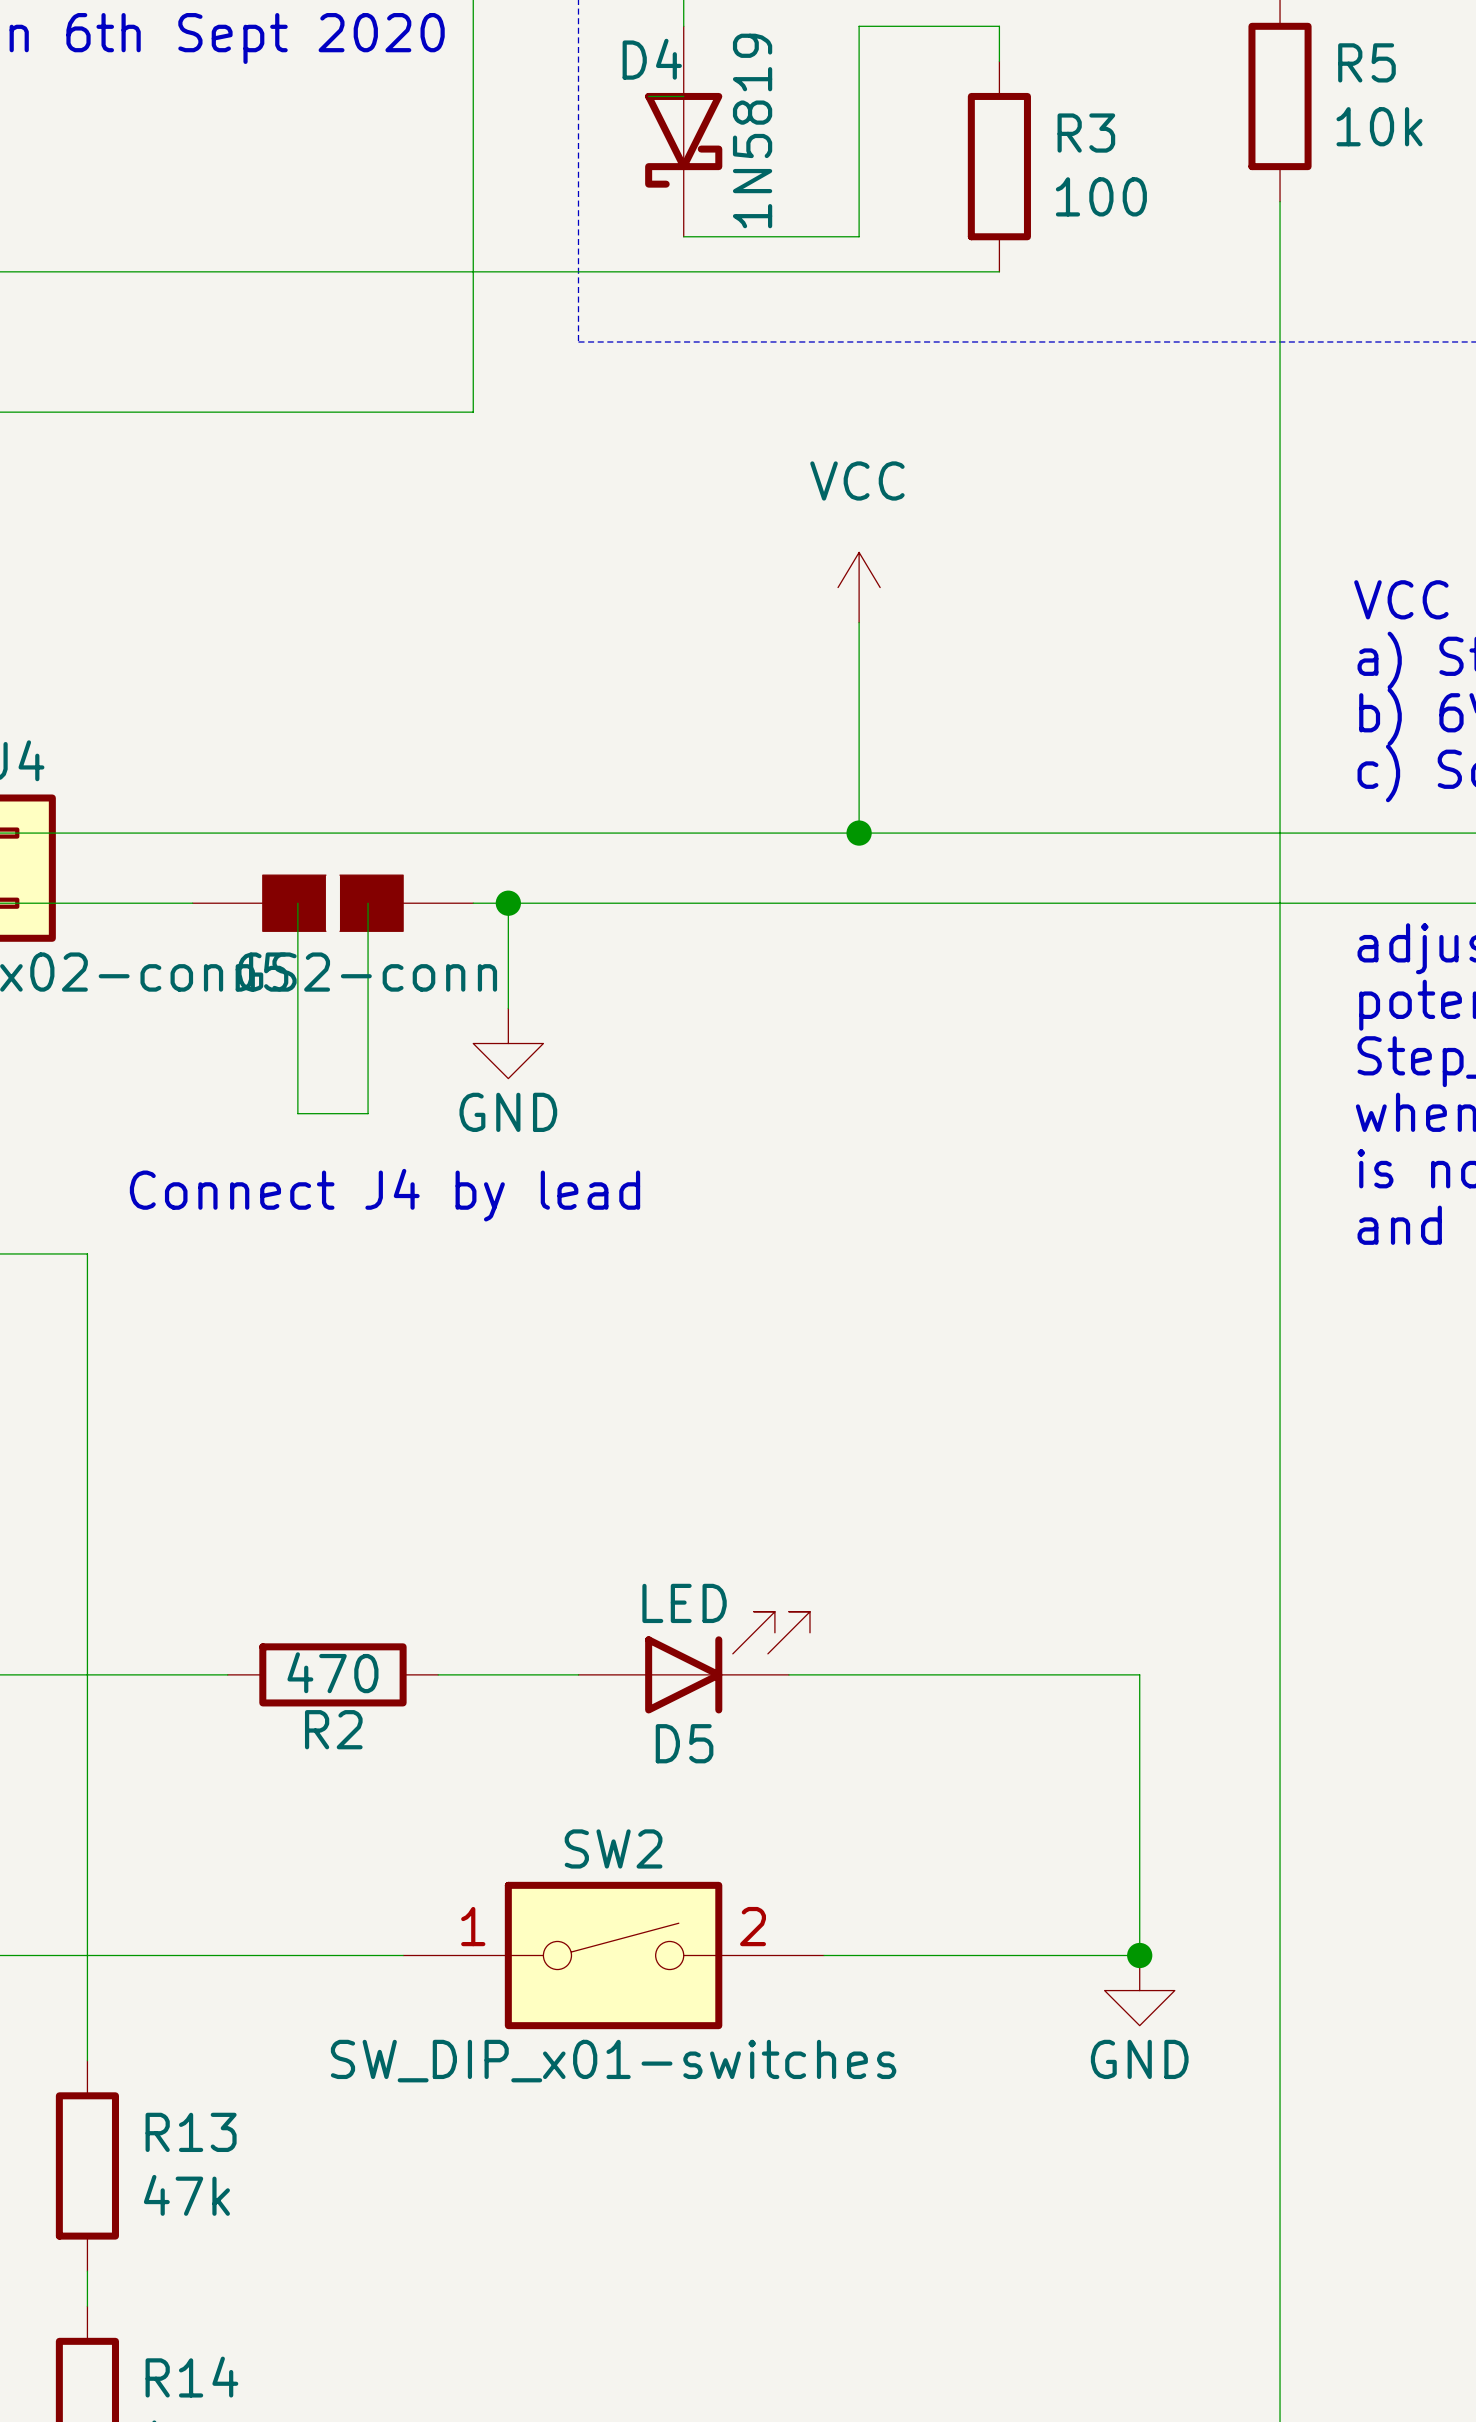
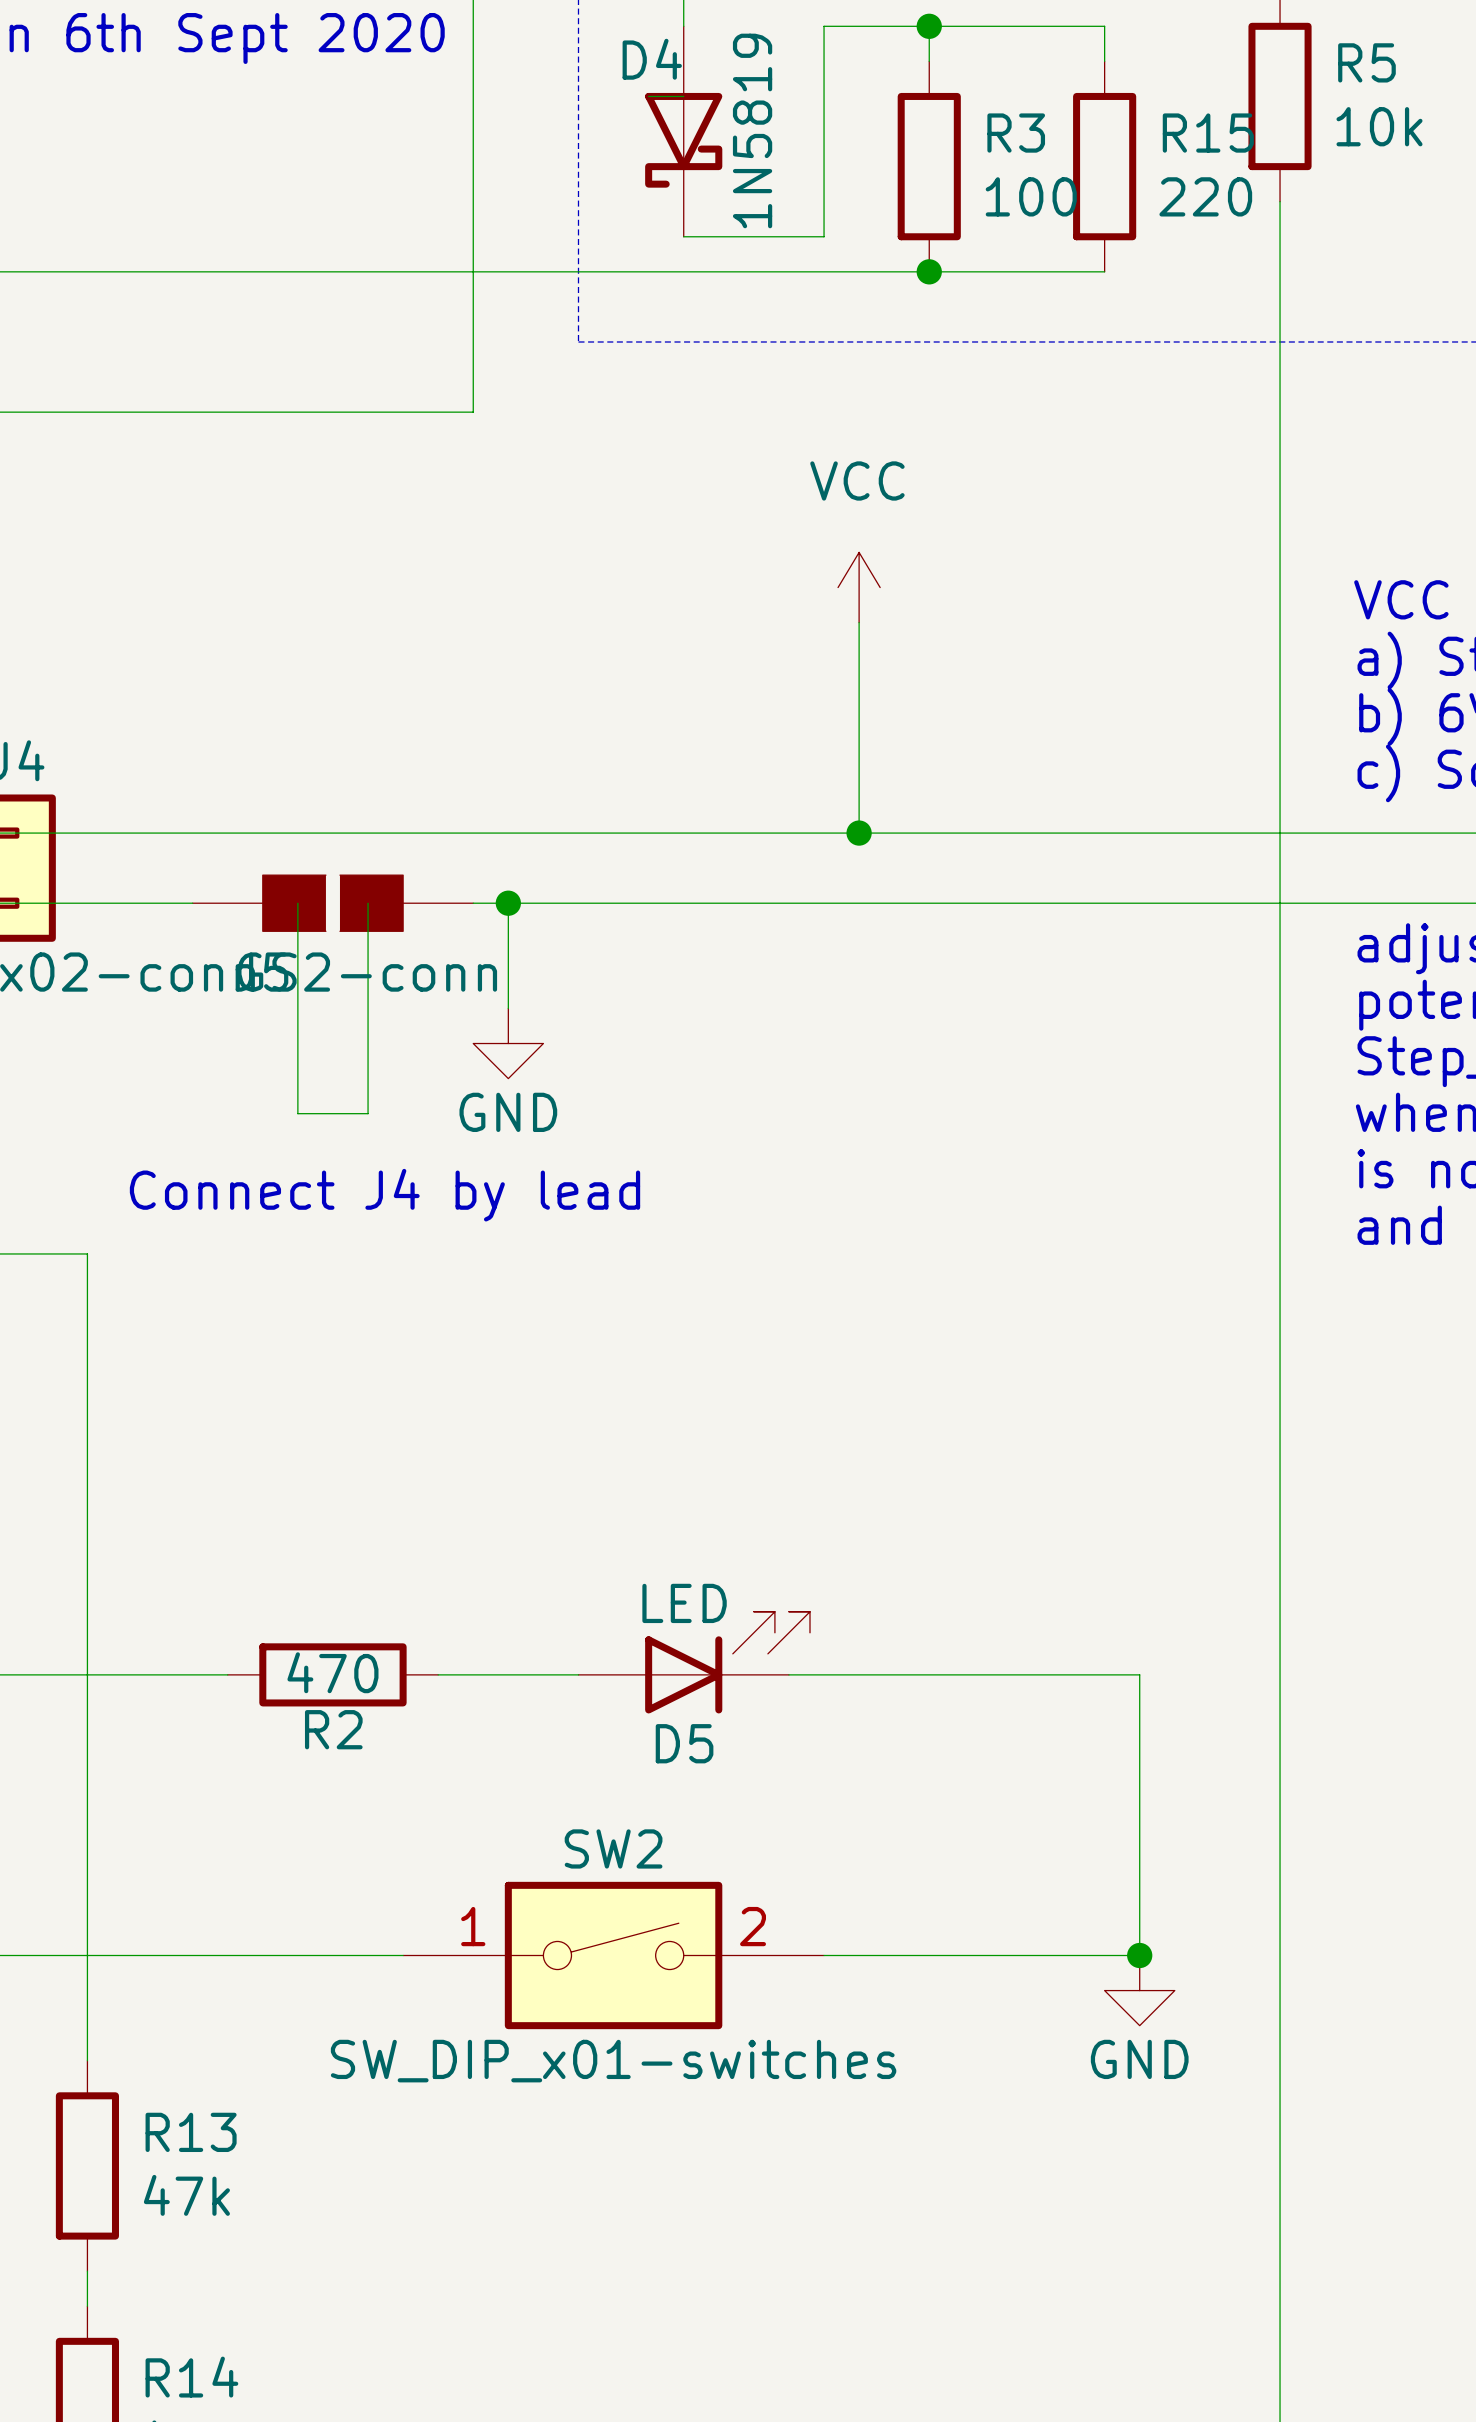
wire: (859, 26) (859, 236) (824, 236) -> (859, 26) (824, 26) (824, 236)
wire: none -> (929, 26) (929, 61)
junction: none -> (929, 26)
wire: (999, 26) (999, 61) -> (999, 26) (1104, 26) (1104, 61)
R3 position: (999, 166) -> (929, 166)
R15: none -> 220 (1104, 166)
junction: none -> (929, 271)
wire: none -> (999, 271) (1104, 271)

